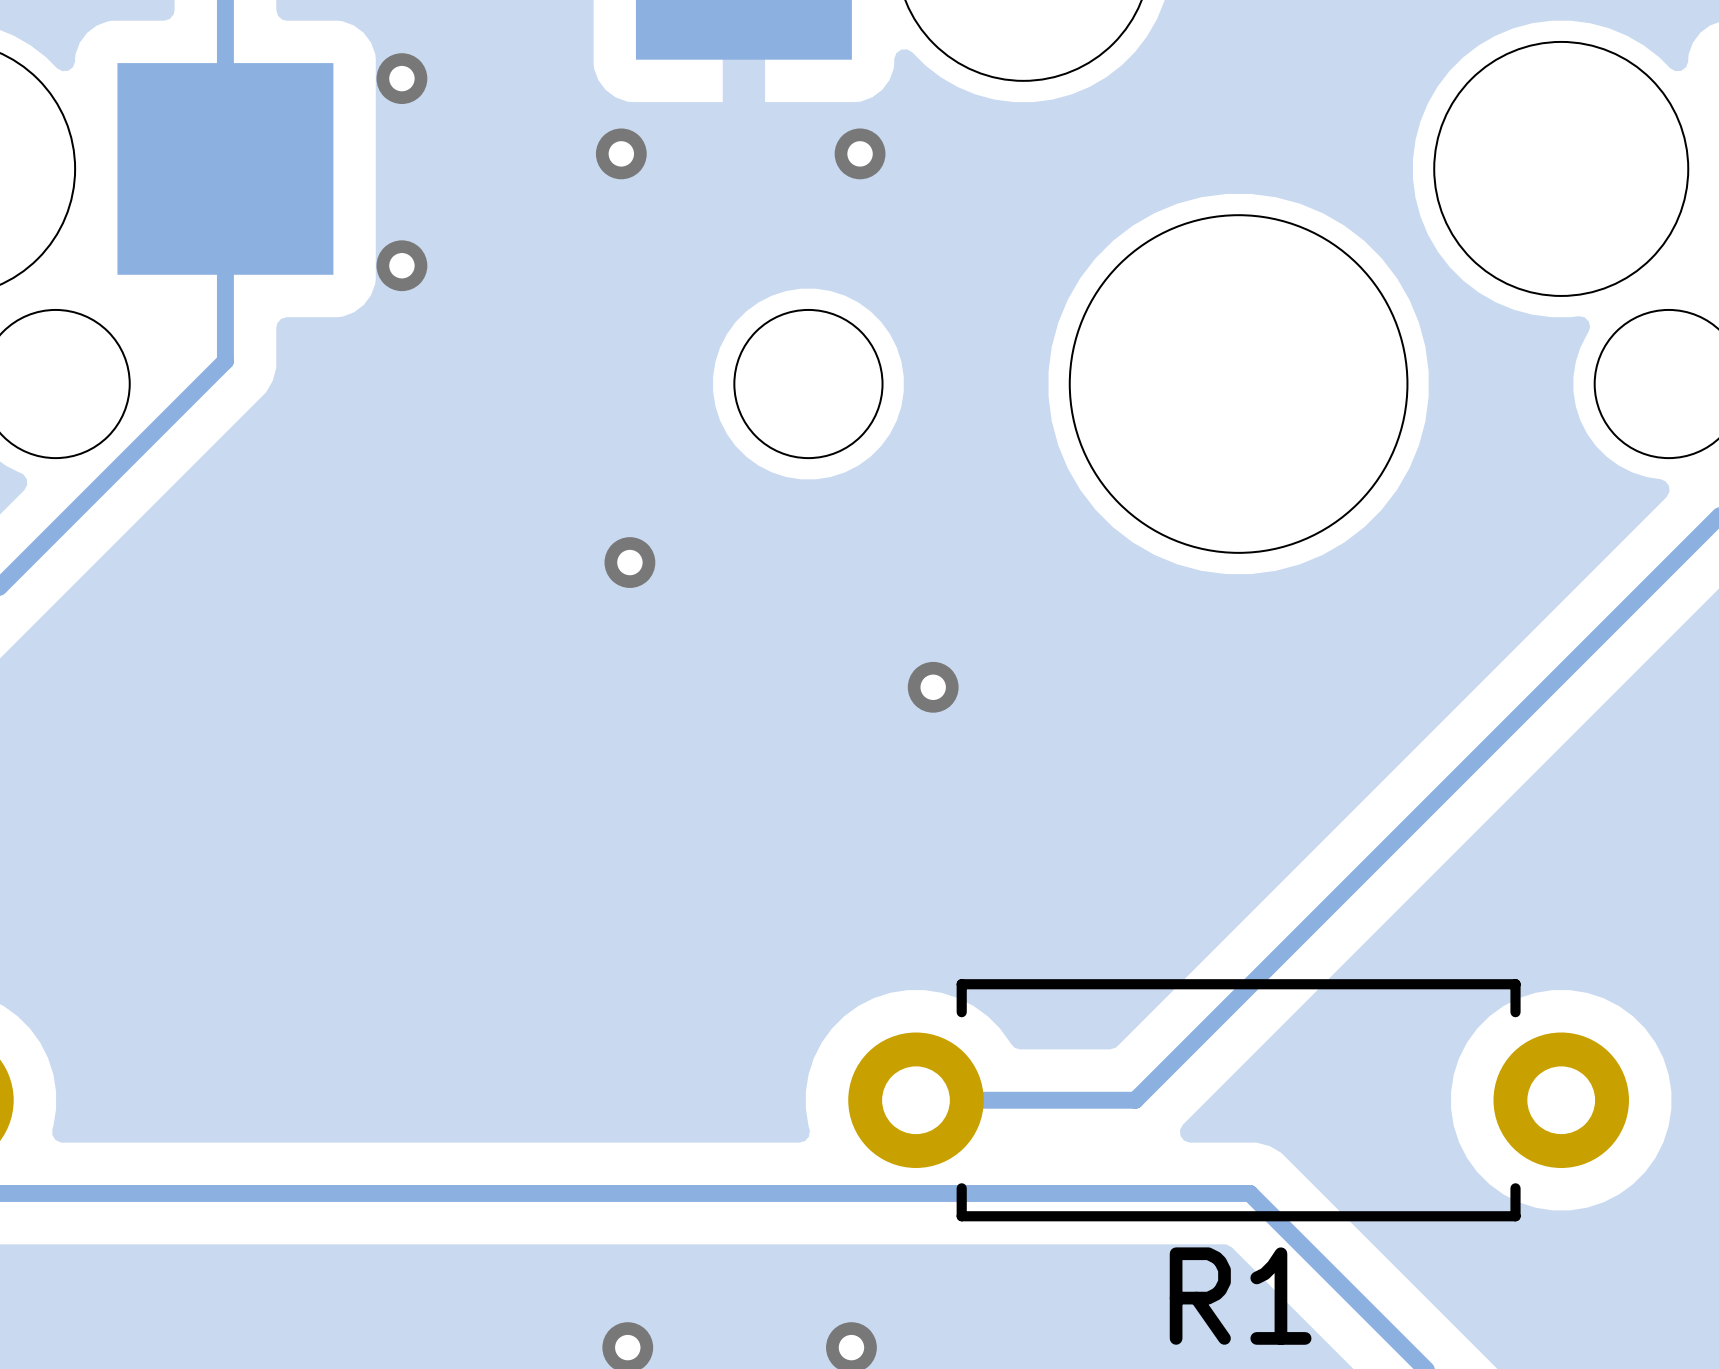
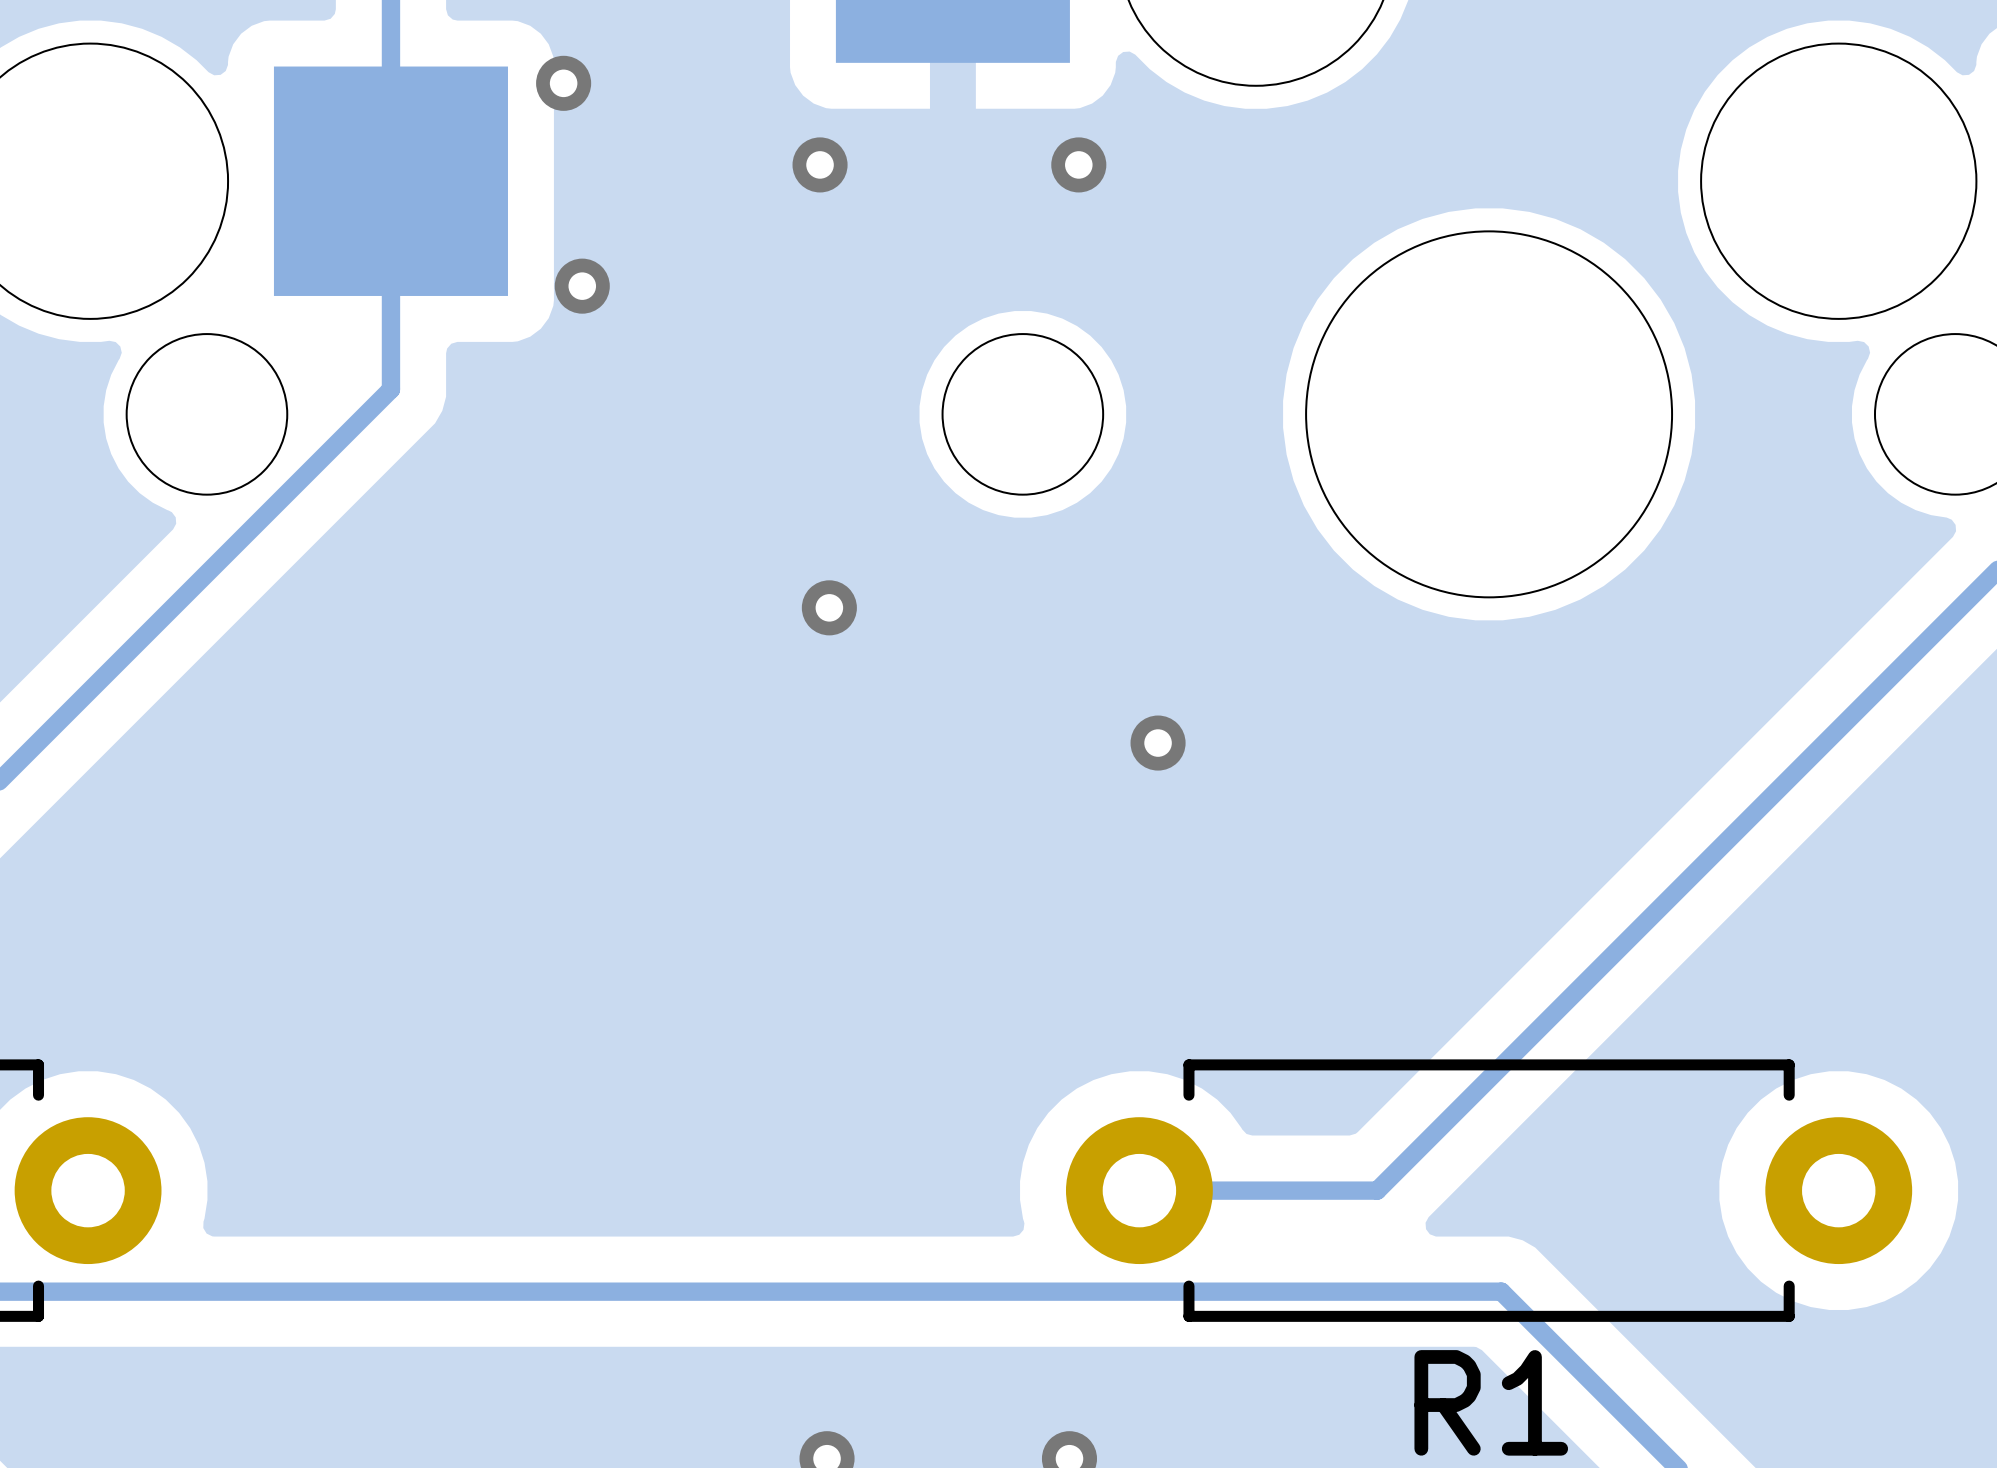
via position: (401, 78) -> (563, 83)

